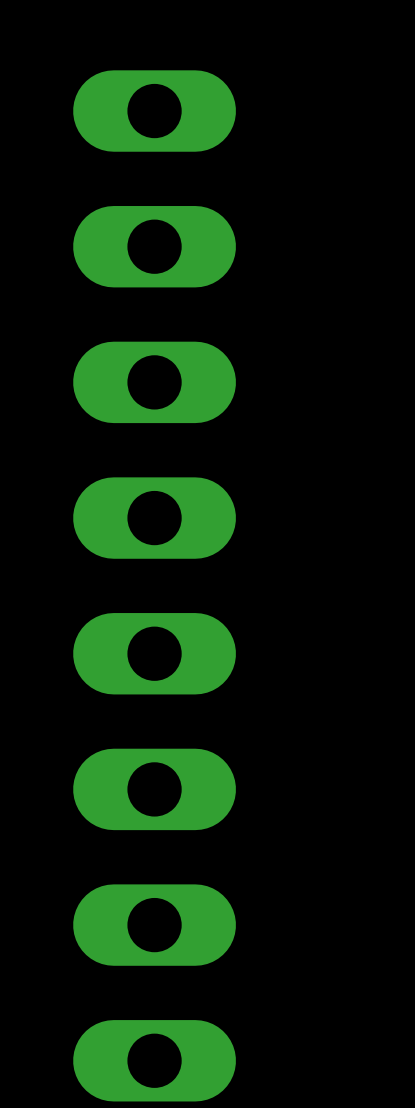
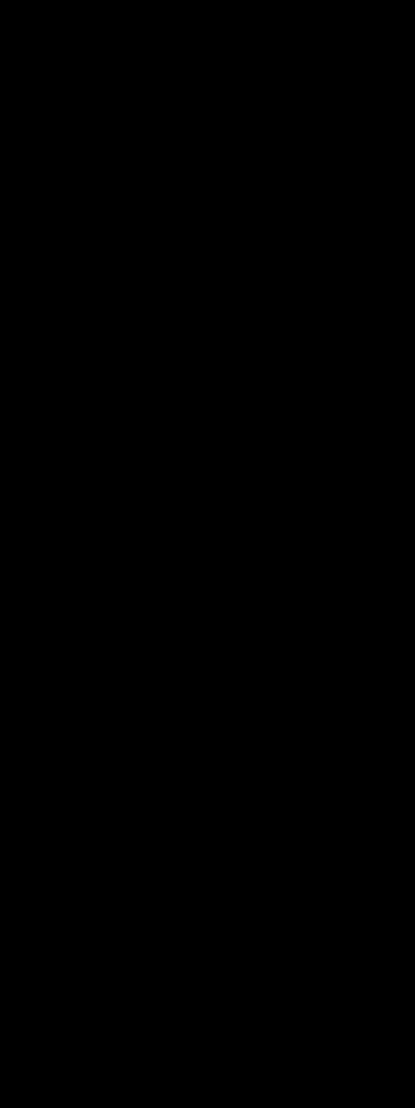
part: (154, 585) -> none

